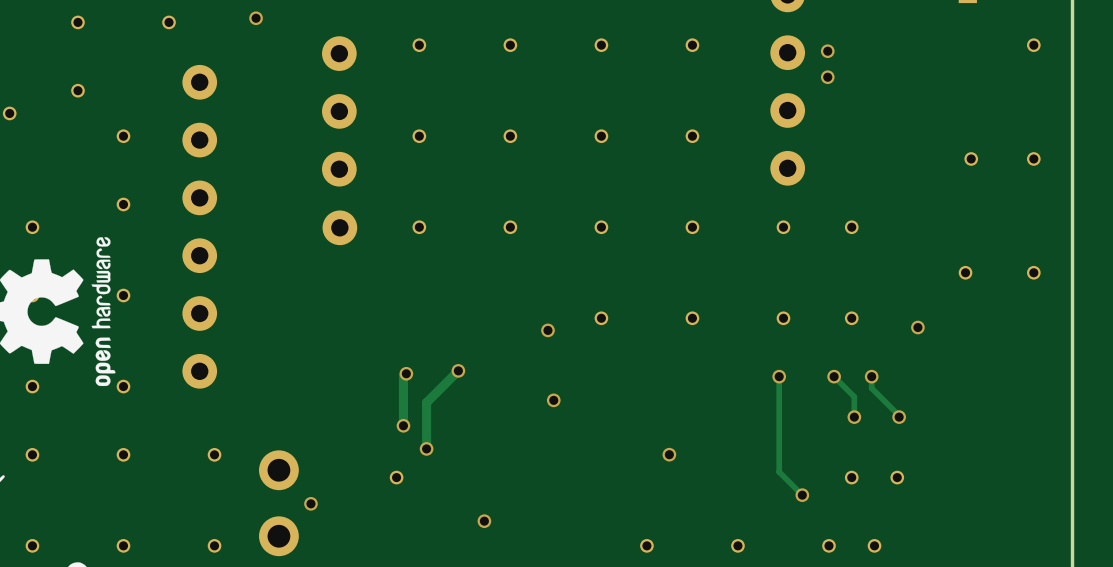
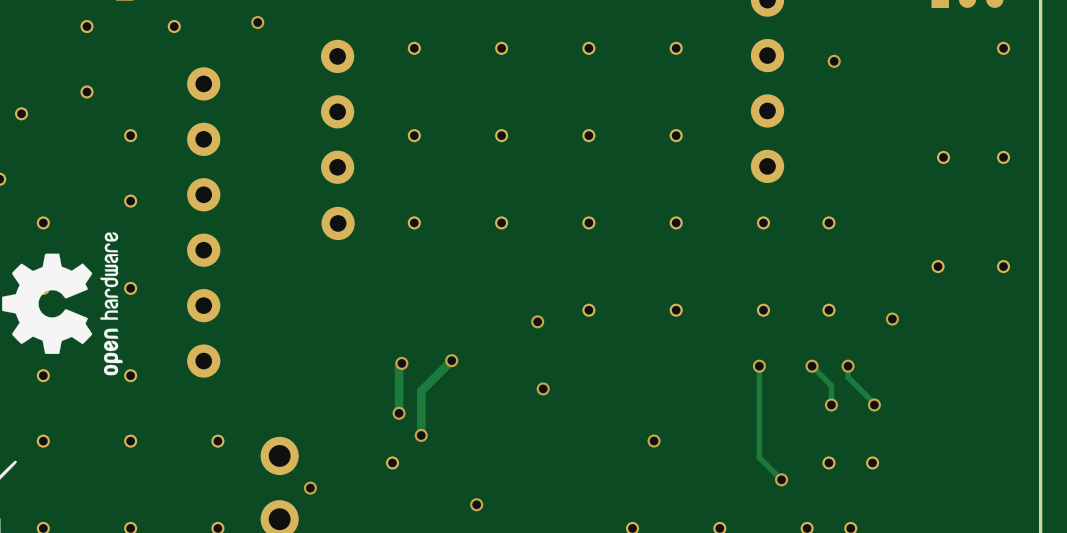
via: (827, 51) -> none
via: none -> (834, 61)
via: (827, 77) -> none

